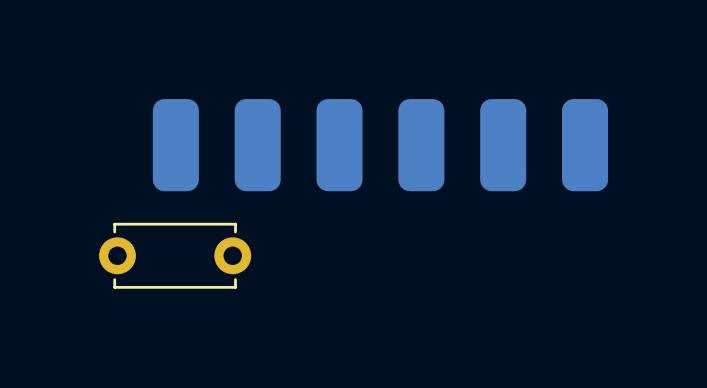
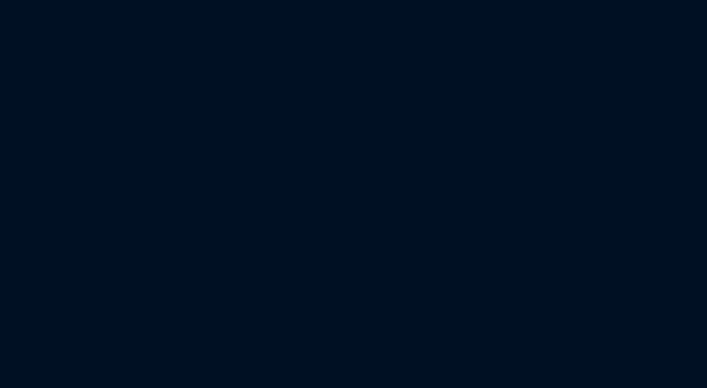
part: (175, 145) -> none
part: (257, 145) -> none
part: (339, 145) -> none
part: (421, 145) -> none
part: (503, 145) -> none
part: (585, 145) -> none
part: (175, 255) -> none

